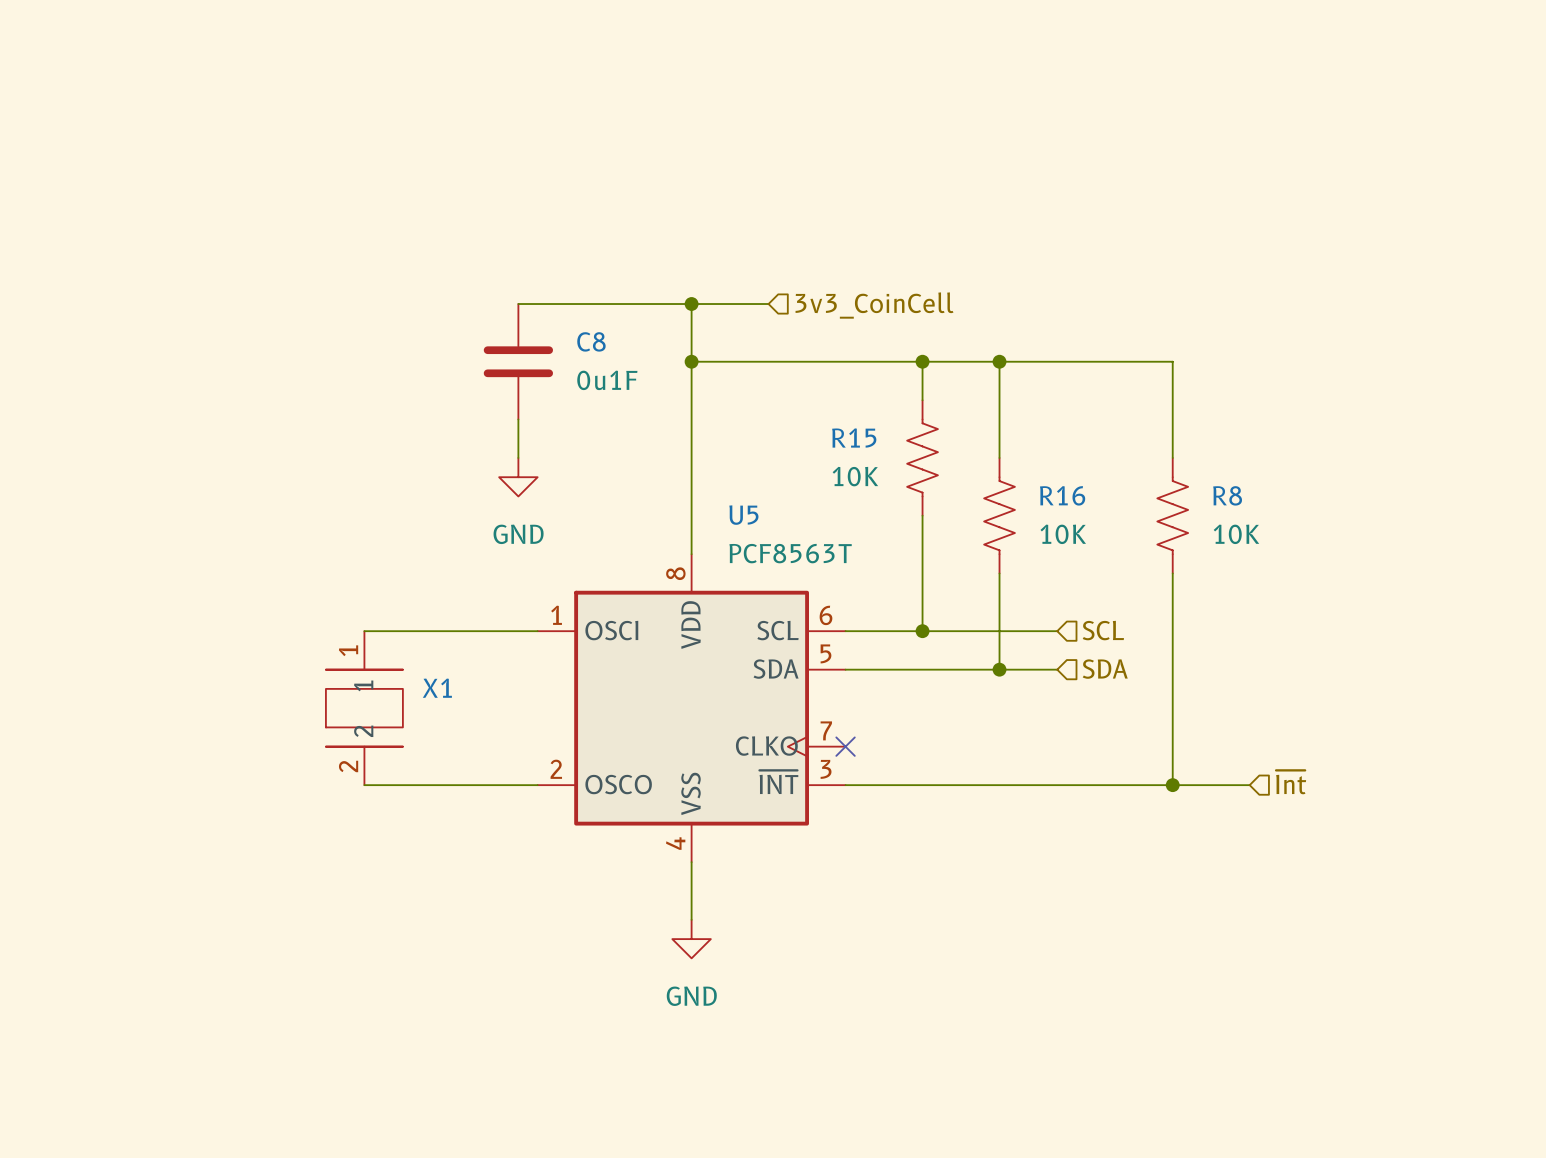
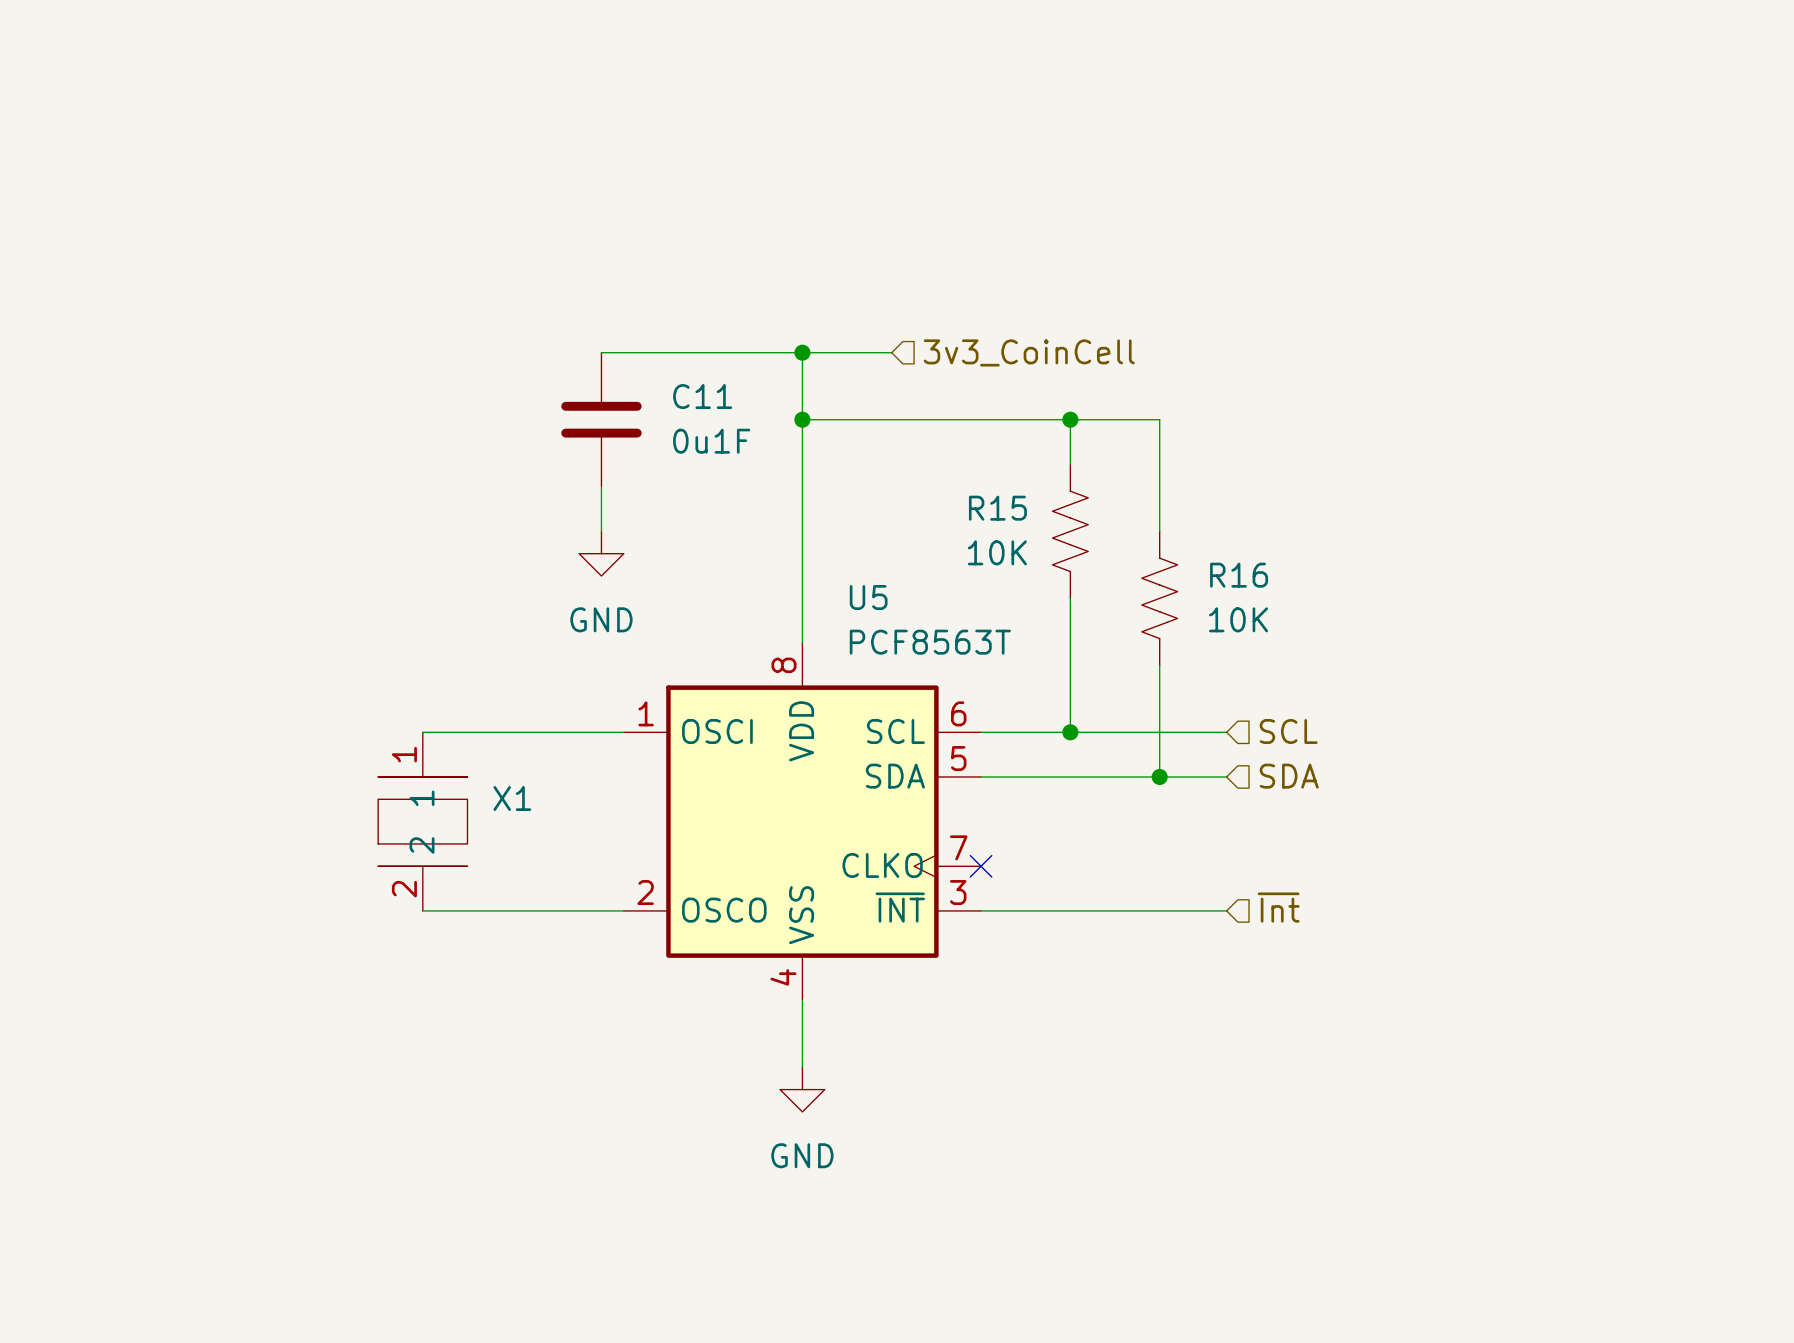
C8 name: C8 (591, 341) -> C11 (702, 396)
wire: (999, 361) (1172, 361) (1172, 457) -> none
junction: (999, 361) -> none
R8: 10K (1172, 515) -> none
wire: (1172, 573) (1172, 785) -> none
hierarchical label position: ~{Int} (1291, 782) -> ~{Int} (1278, 907)
wire: (1057, 785) (1249, 785) -> none
junction: (1172, 785) -> none

